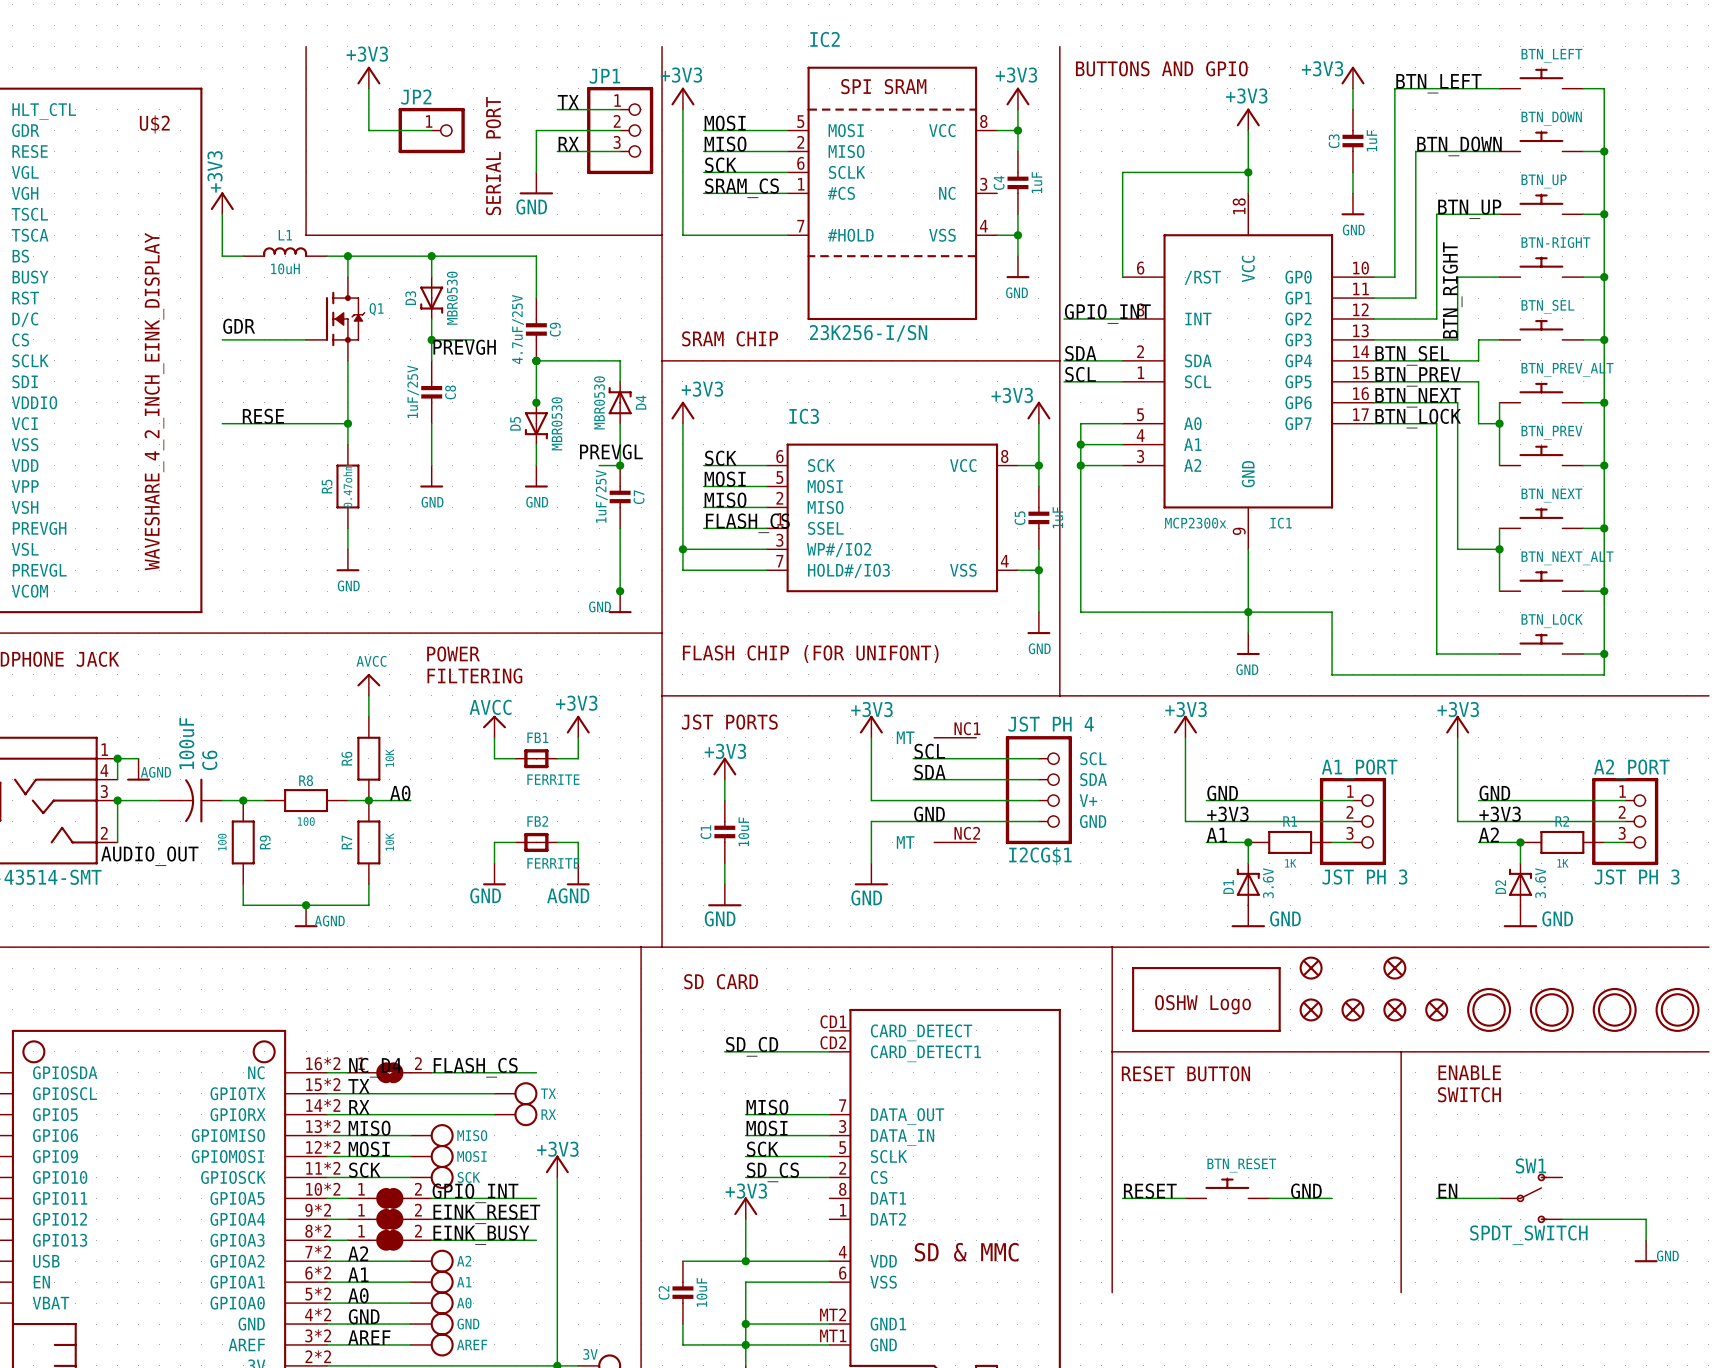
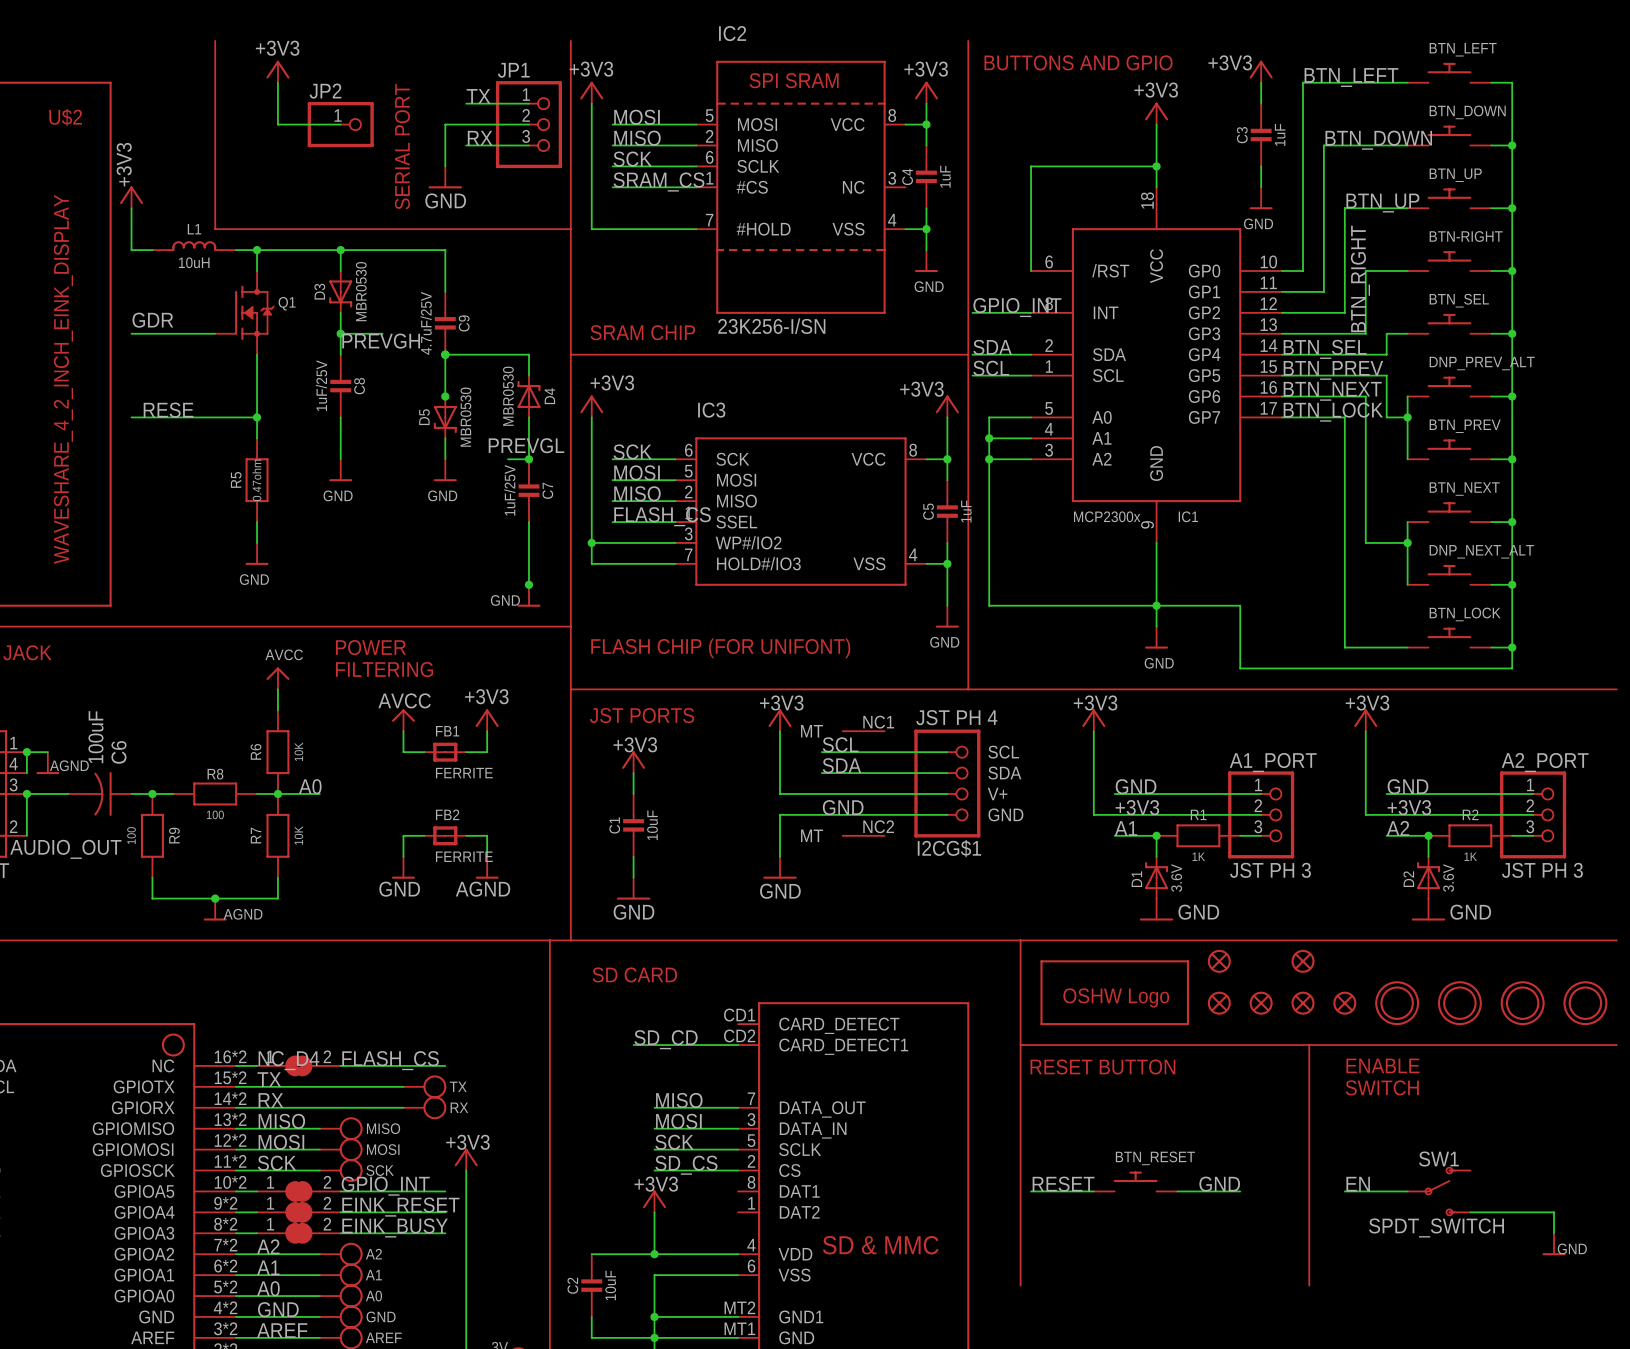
BTN_PREV_ALT name: BTN_PREV_ALT (1567, 369) -> DNP_PREV_ALT (1482, 363)
BTN_NEXT_ALT name: BTN_NEXT_ALT (1567, 558) -> DNP_NEXT_ALT (1481, 551)

